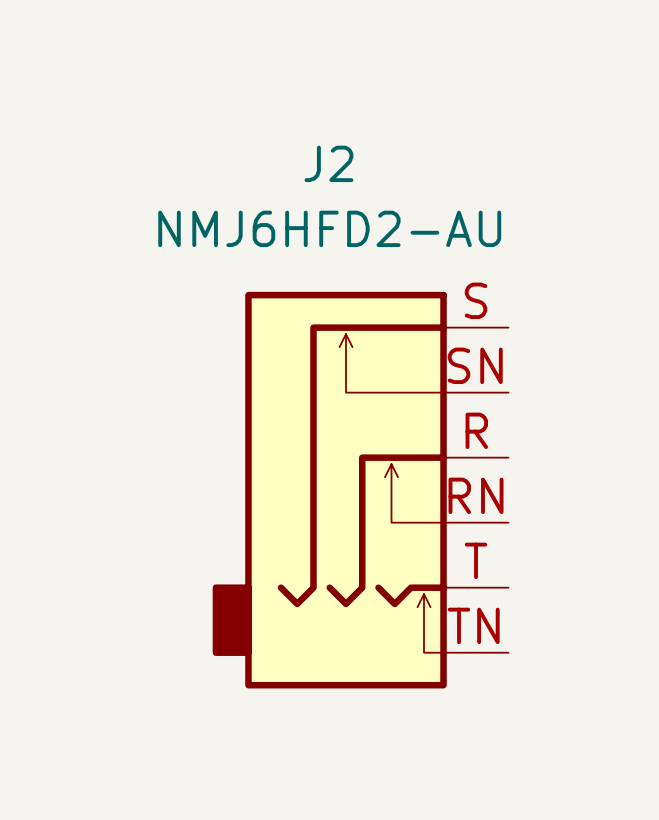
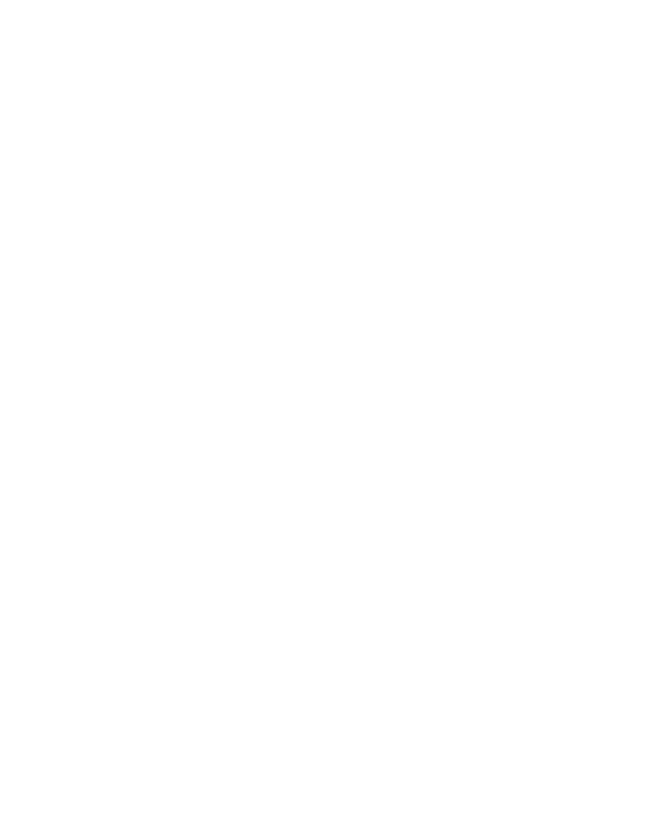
J2: NMJ6HFD2-AU (360, 490) -> none

